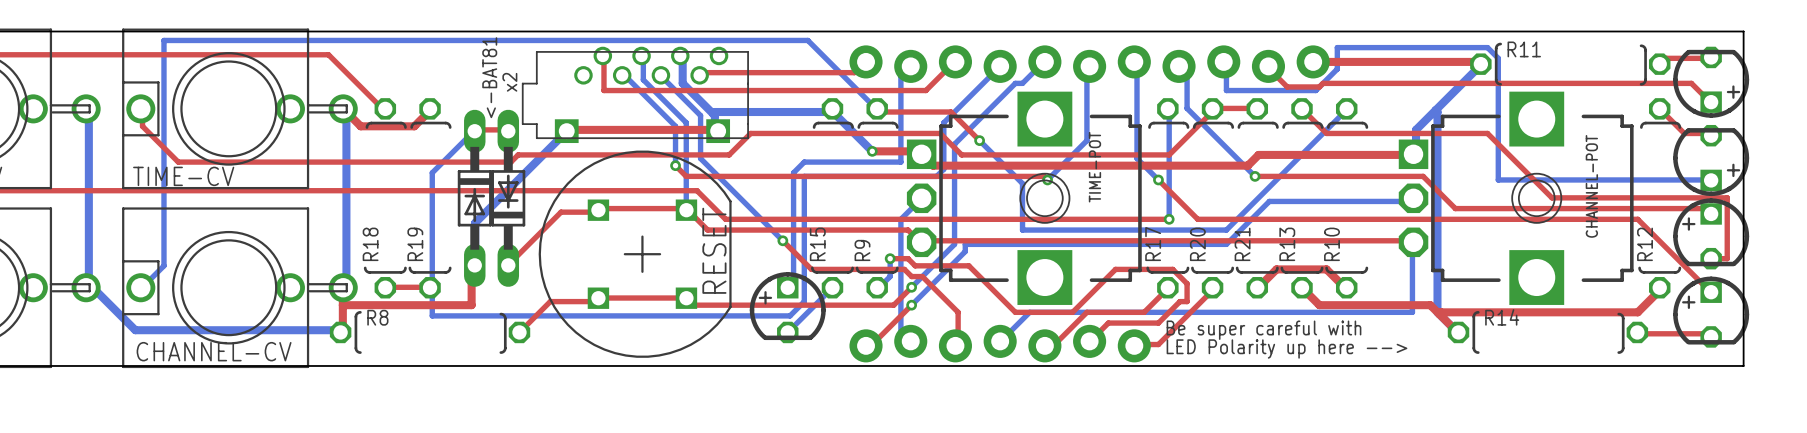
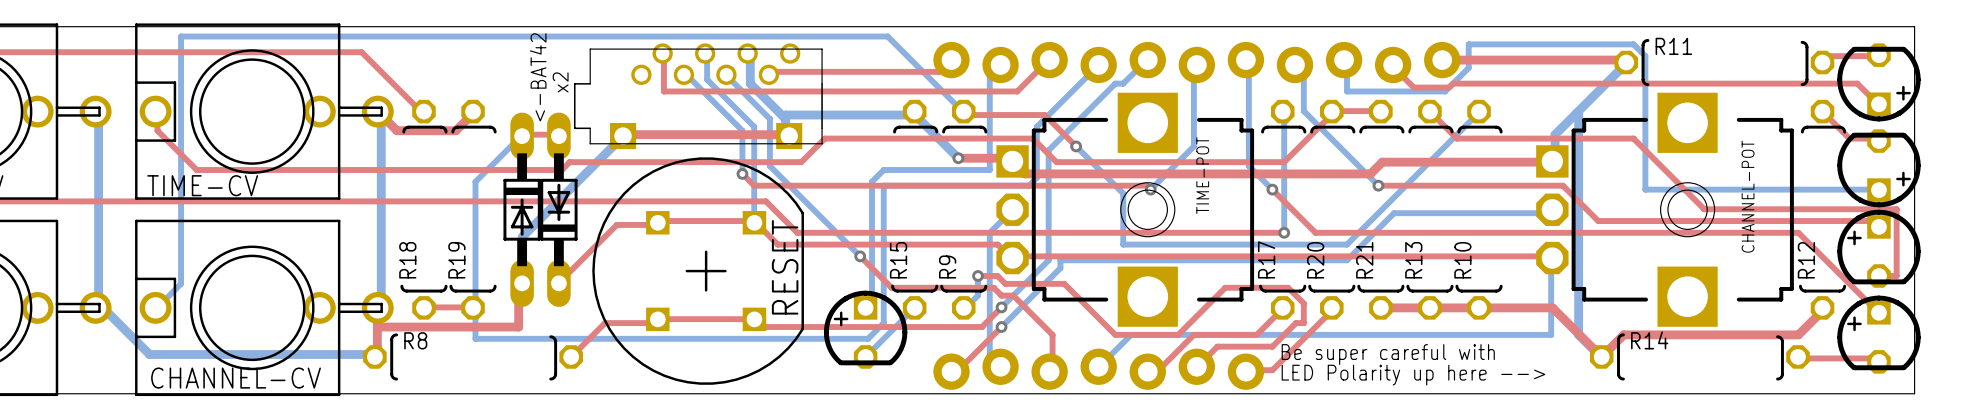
text: <-BAT81 (489, 77) -> <-BAT42 (538, 77)
top track: (1257, 287) (1276, 269) (1326, 269) (1346, 287) -> (1380, 307) (1552, 307) (1601, 356) (1623, 334)
top track: (1302, 287) (1319, 305) (1430, 305) (1458, 332) -> none
top track: (1478, 312) (1441, 312) (1439, 314) -> none

